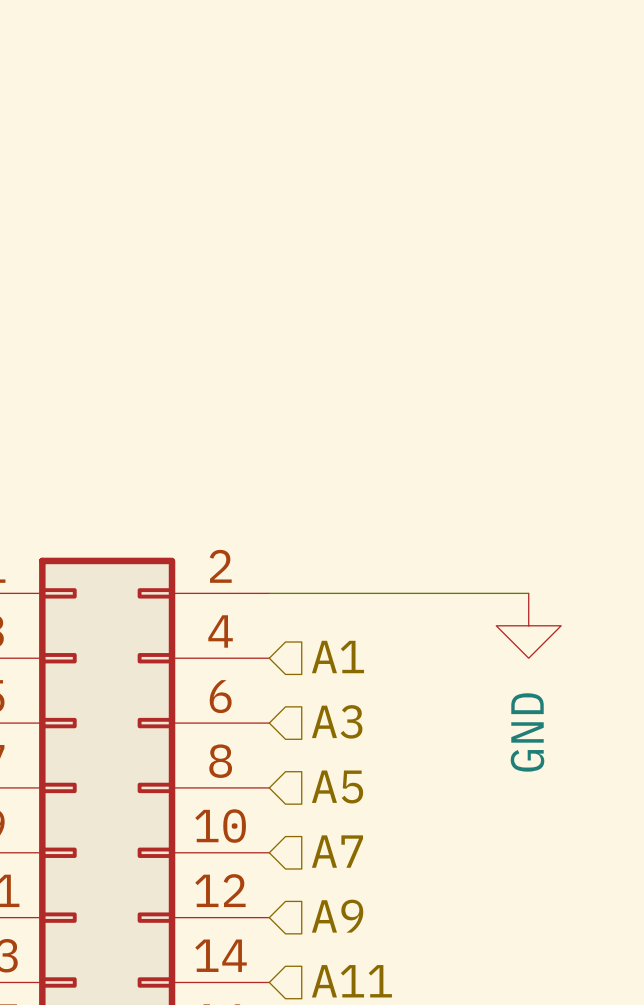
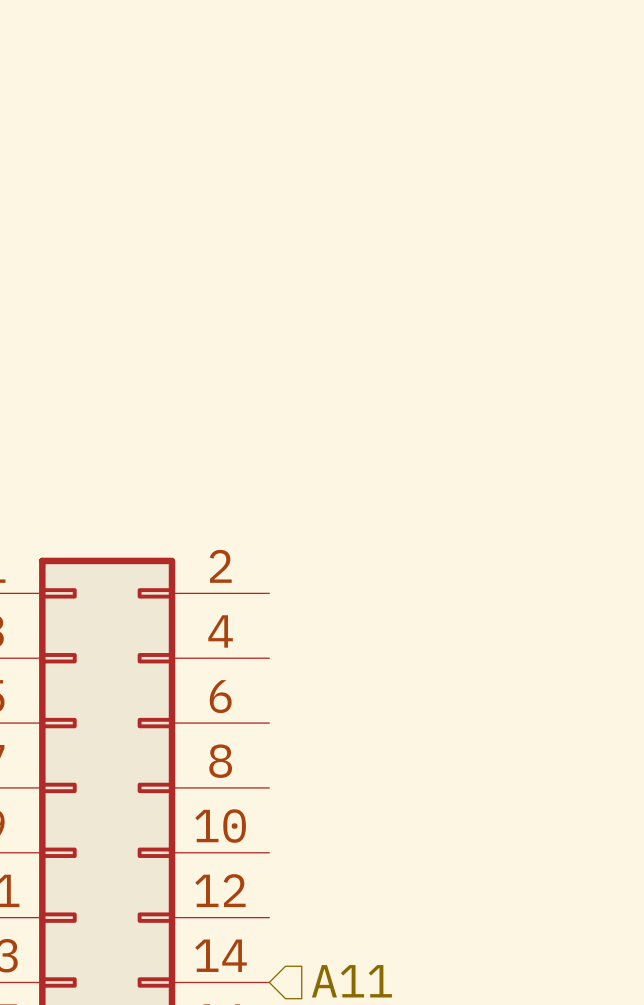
wire: (269, 593) (528, 593) -> none
power symbol: GND (528, 625) -> none
hierarchical label: A1 (337, 657) -> none
hierarchical label: A3 (337, 721) -> none
hierarchical label: A5 (337, 786) -> none
hierarchical label: A7 (337, 851) -> none
hierarchical label: A9 (337, 916) -> none

